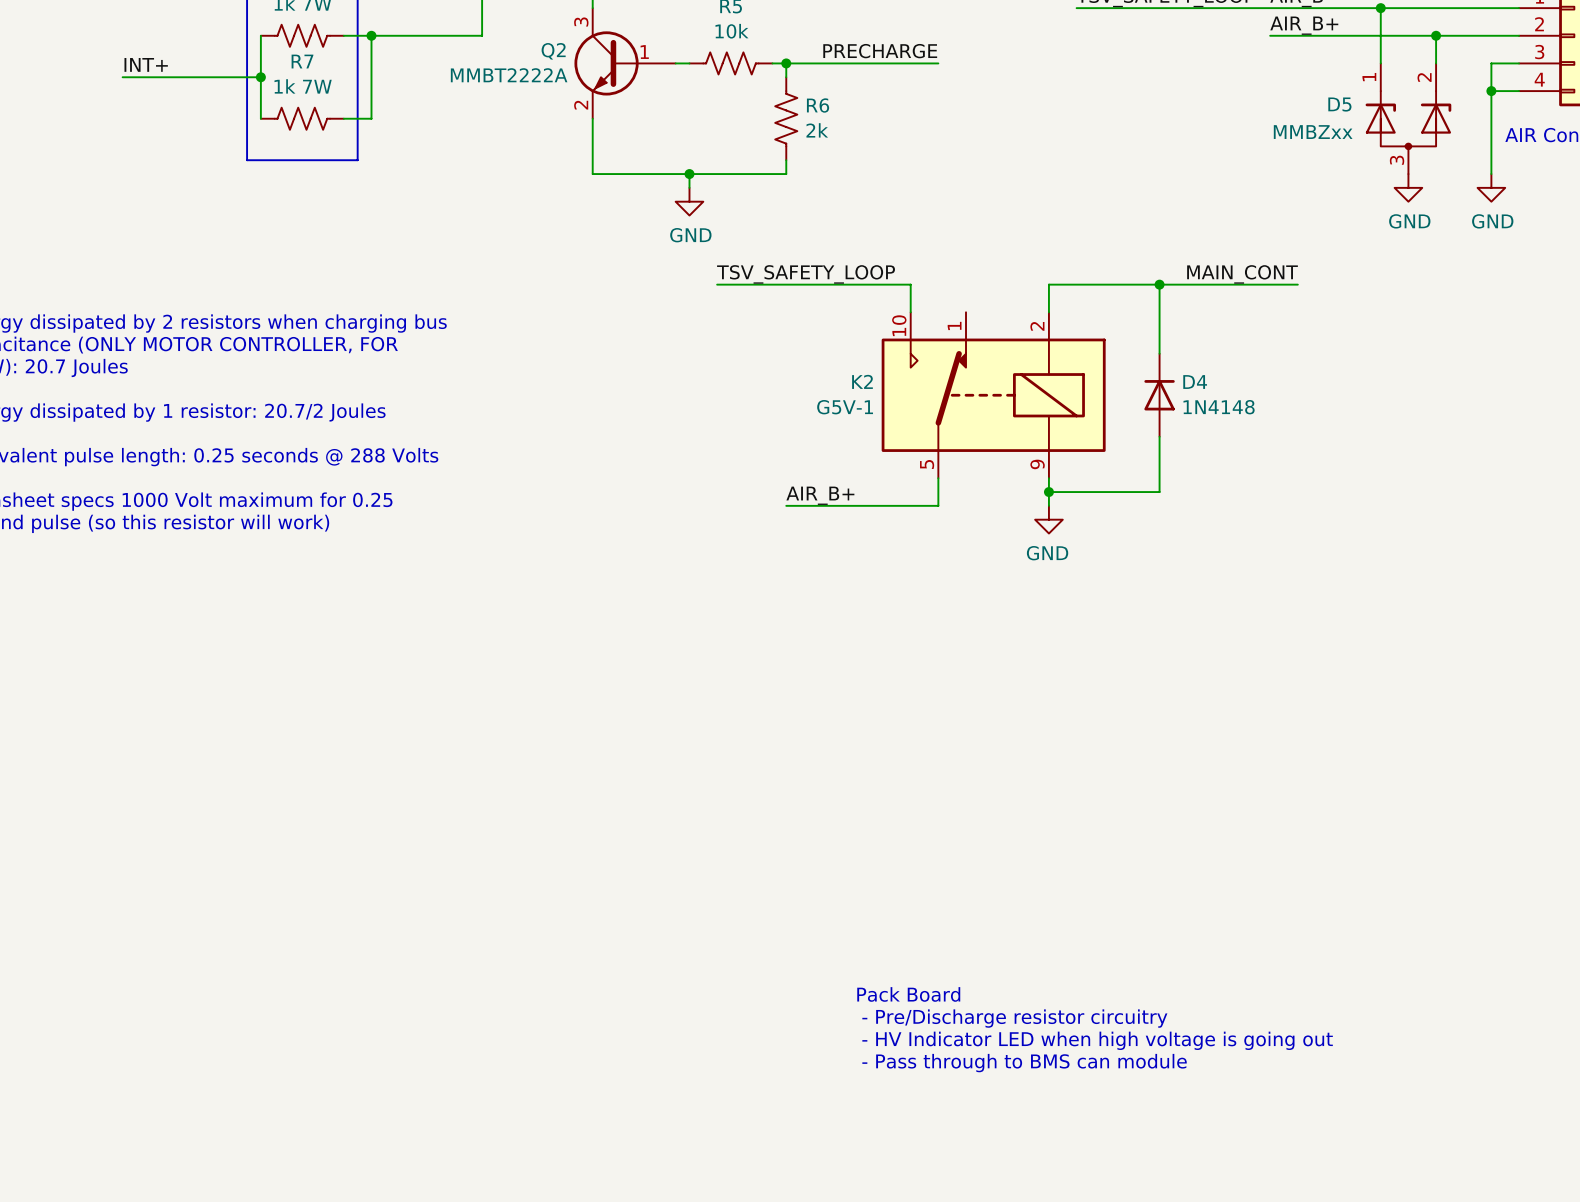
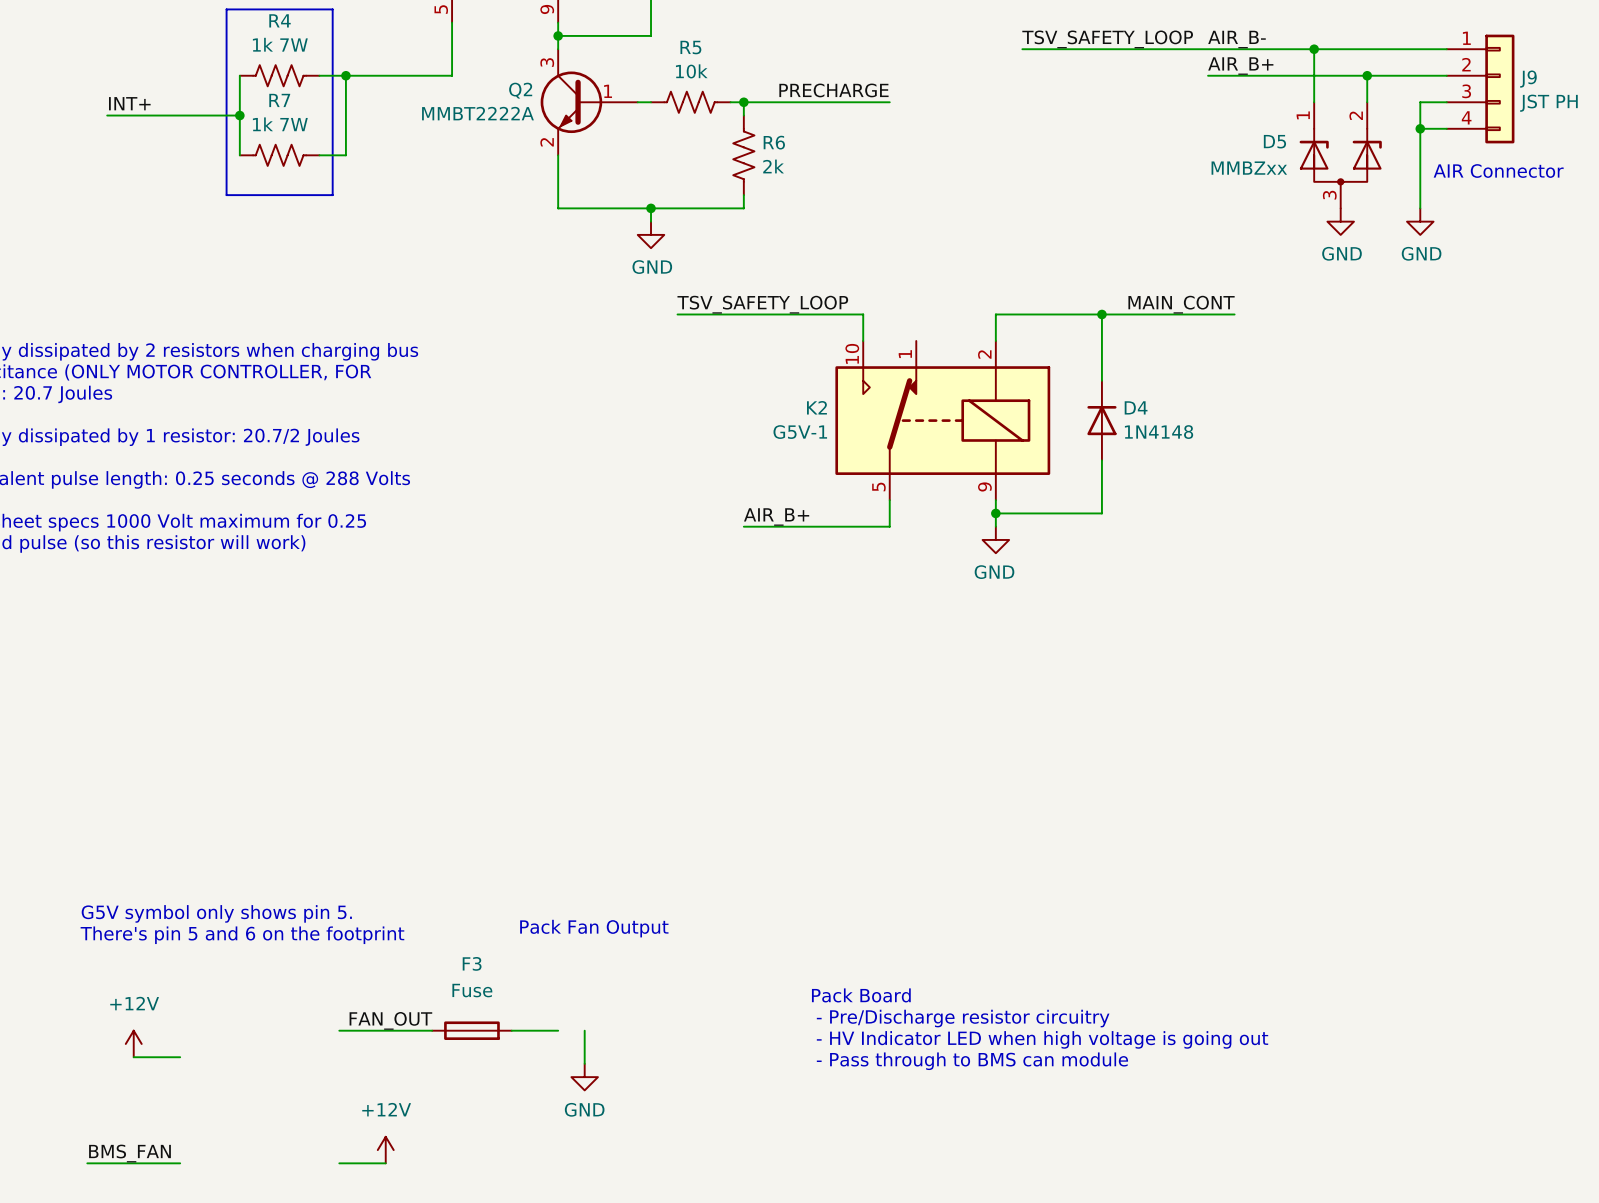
text: none -> G5V symbol only shows pin 5. (216, 913)
text: none -> Pack Fan Output (594, 928)
text: none -> There's pin 5 and 6 on the footprint (242, 935)
label: none -> FAN_OUT (390, 1020)
wire: none -> (339, 1030) (432, 1030)
F3: none -> Fuse (471, 1030)
wire: none -> (511, 1030) (558, 1030)
wire: none -> (584, 1030) (584, 1063)
power symbol: none -> +12V (133, 1043)
wire: none -> (133, 1057) (180, 1057)
power symbol: none -> GND (584, 1077)
power symbol: none -> +12V (385, 1150)
label: none -> BMS_FAN (129, 1153)
wire: none -> (87, 1163) (180, 1163)
wire: none -> (339, 1163) (385, 1163)

